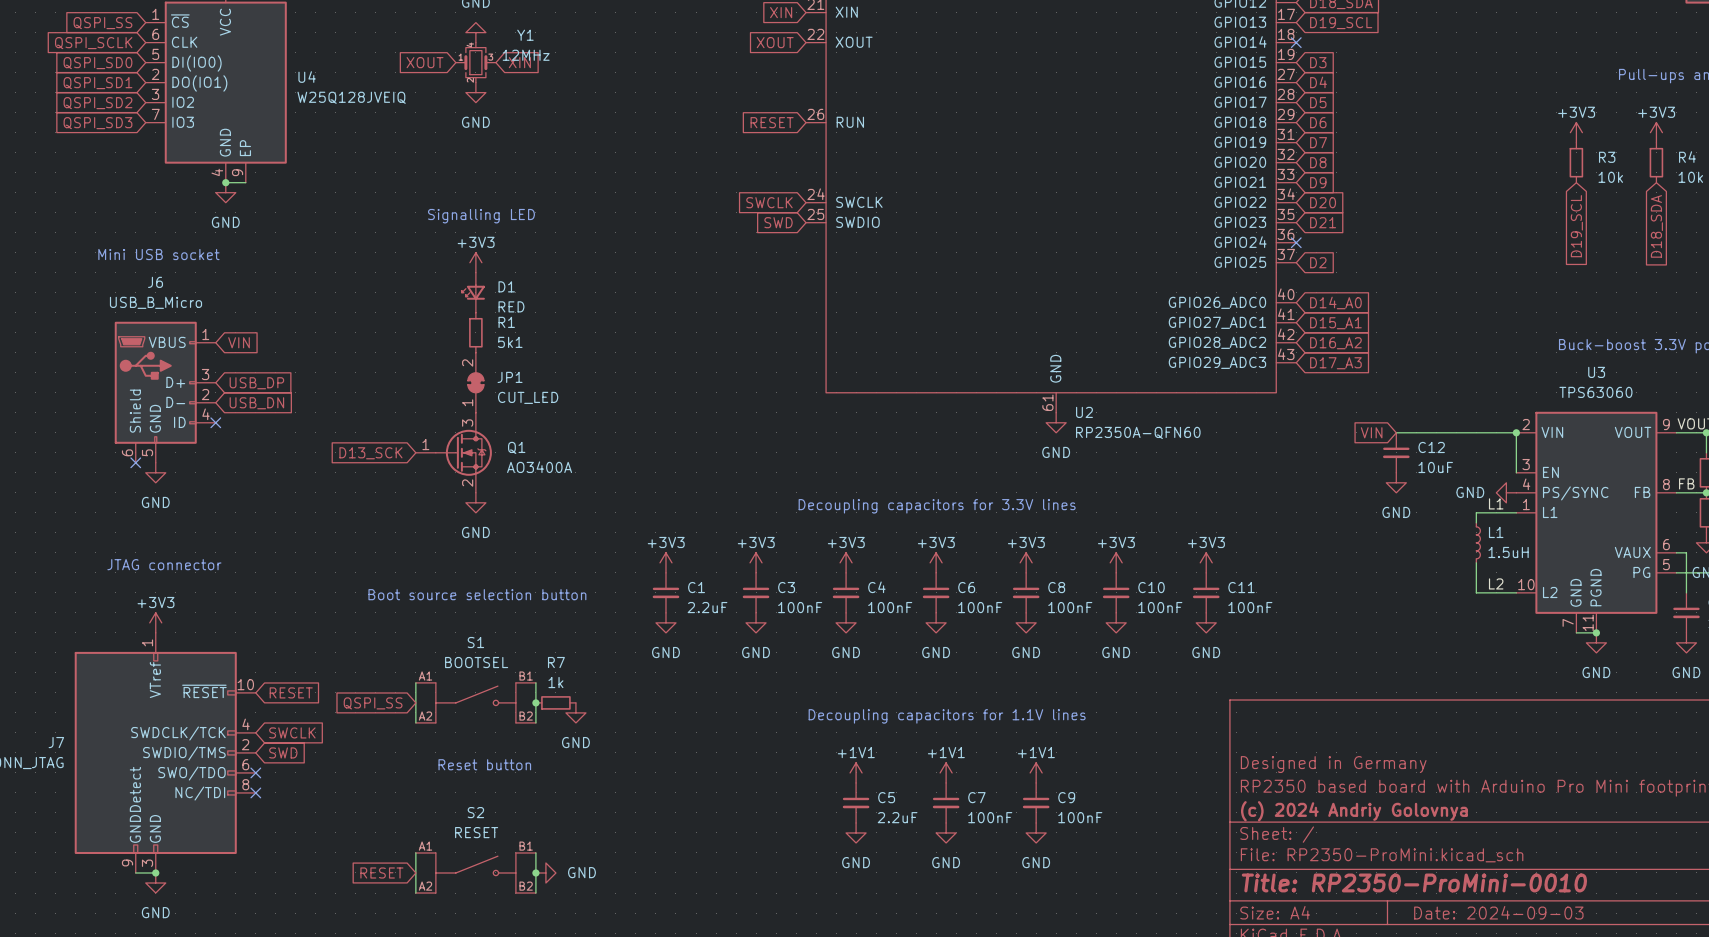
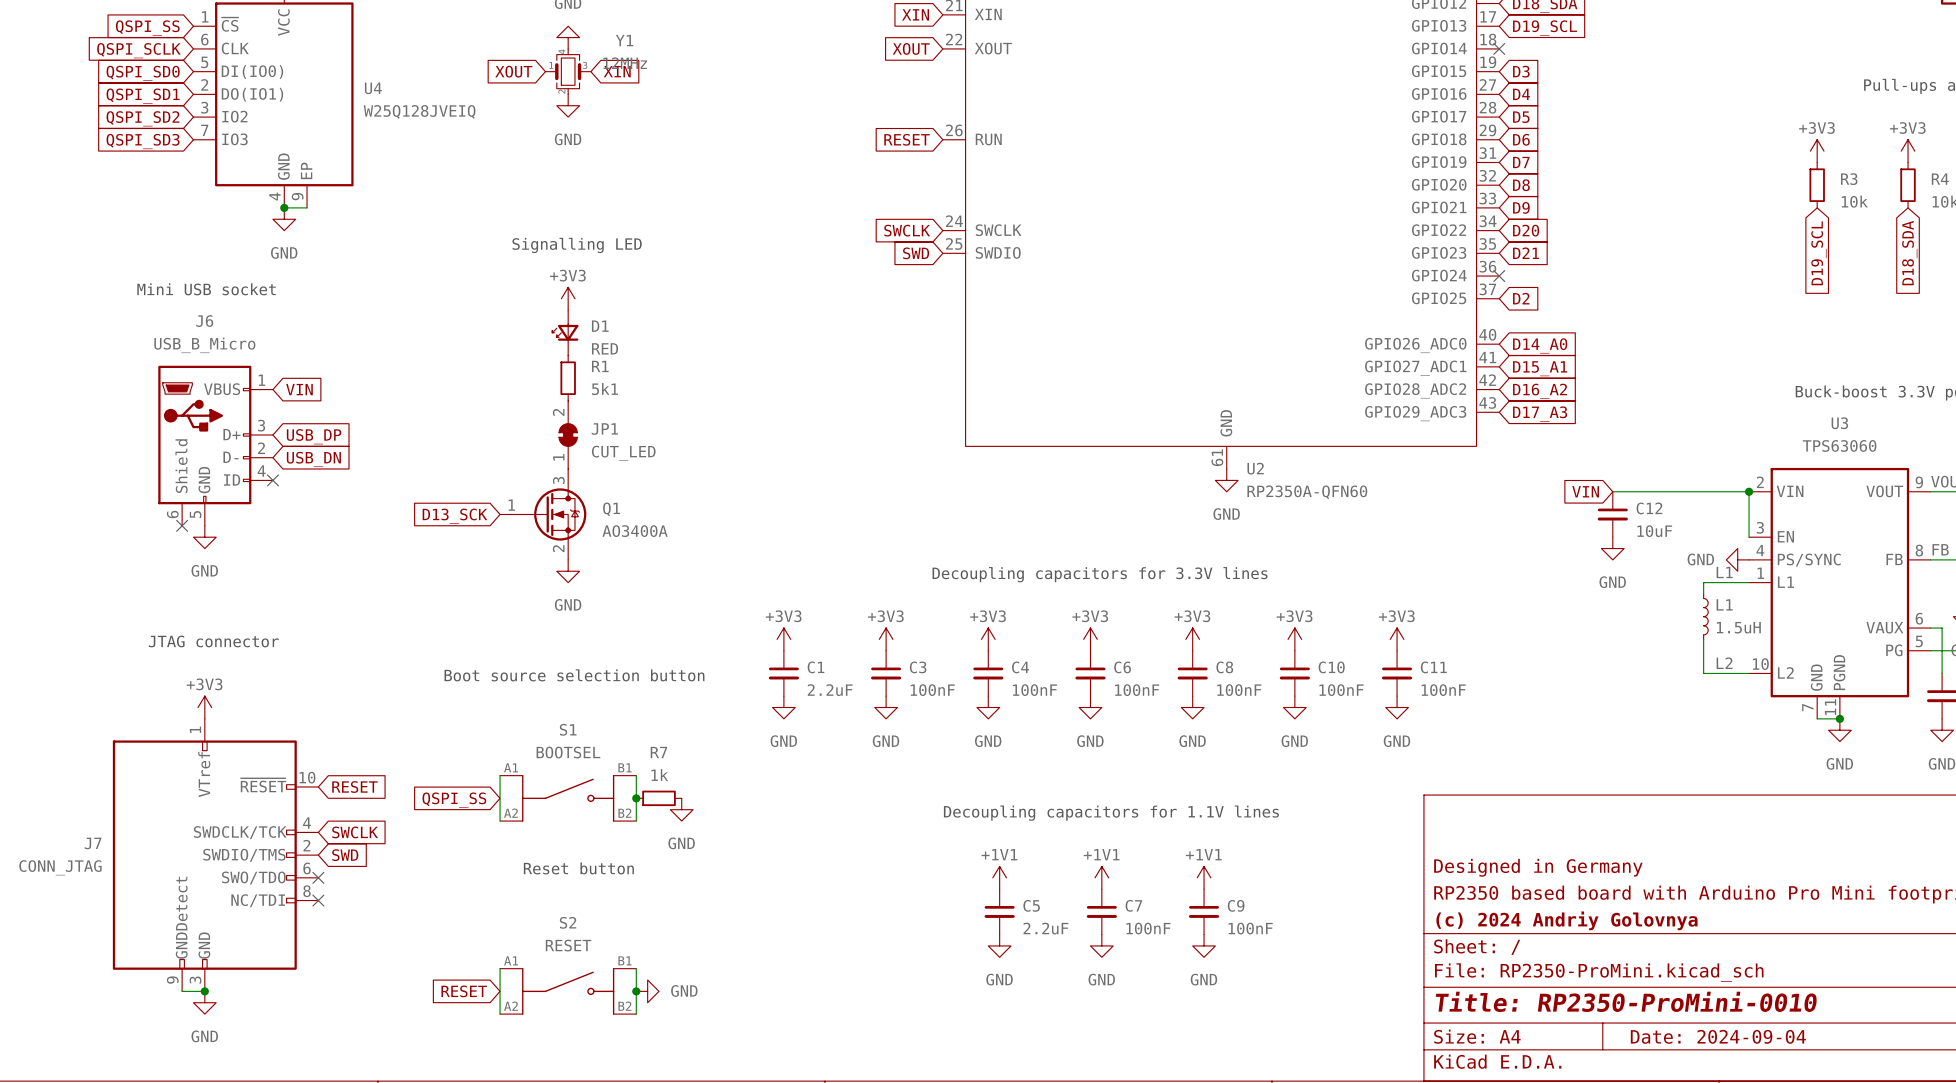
title block: Date: 2024-09-03 (1498, 912) -> Date: 2024-09-04 (1718, 1036)

